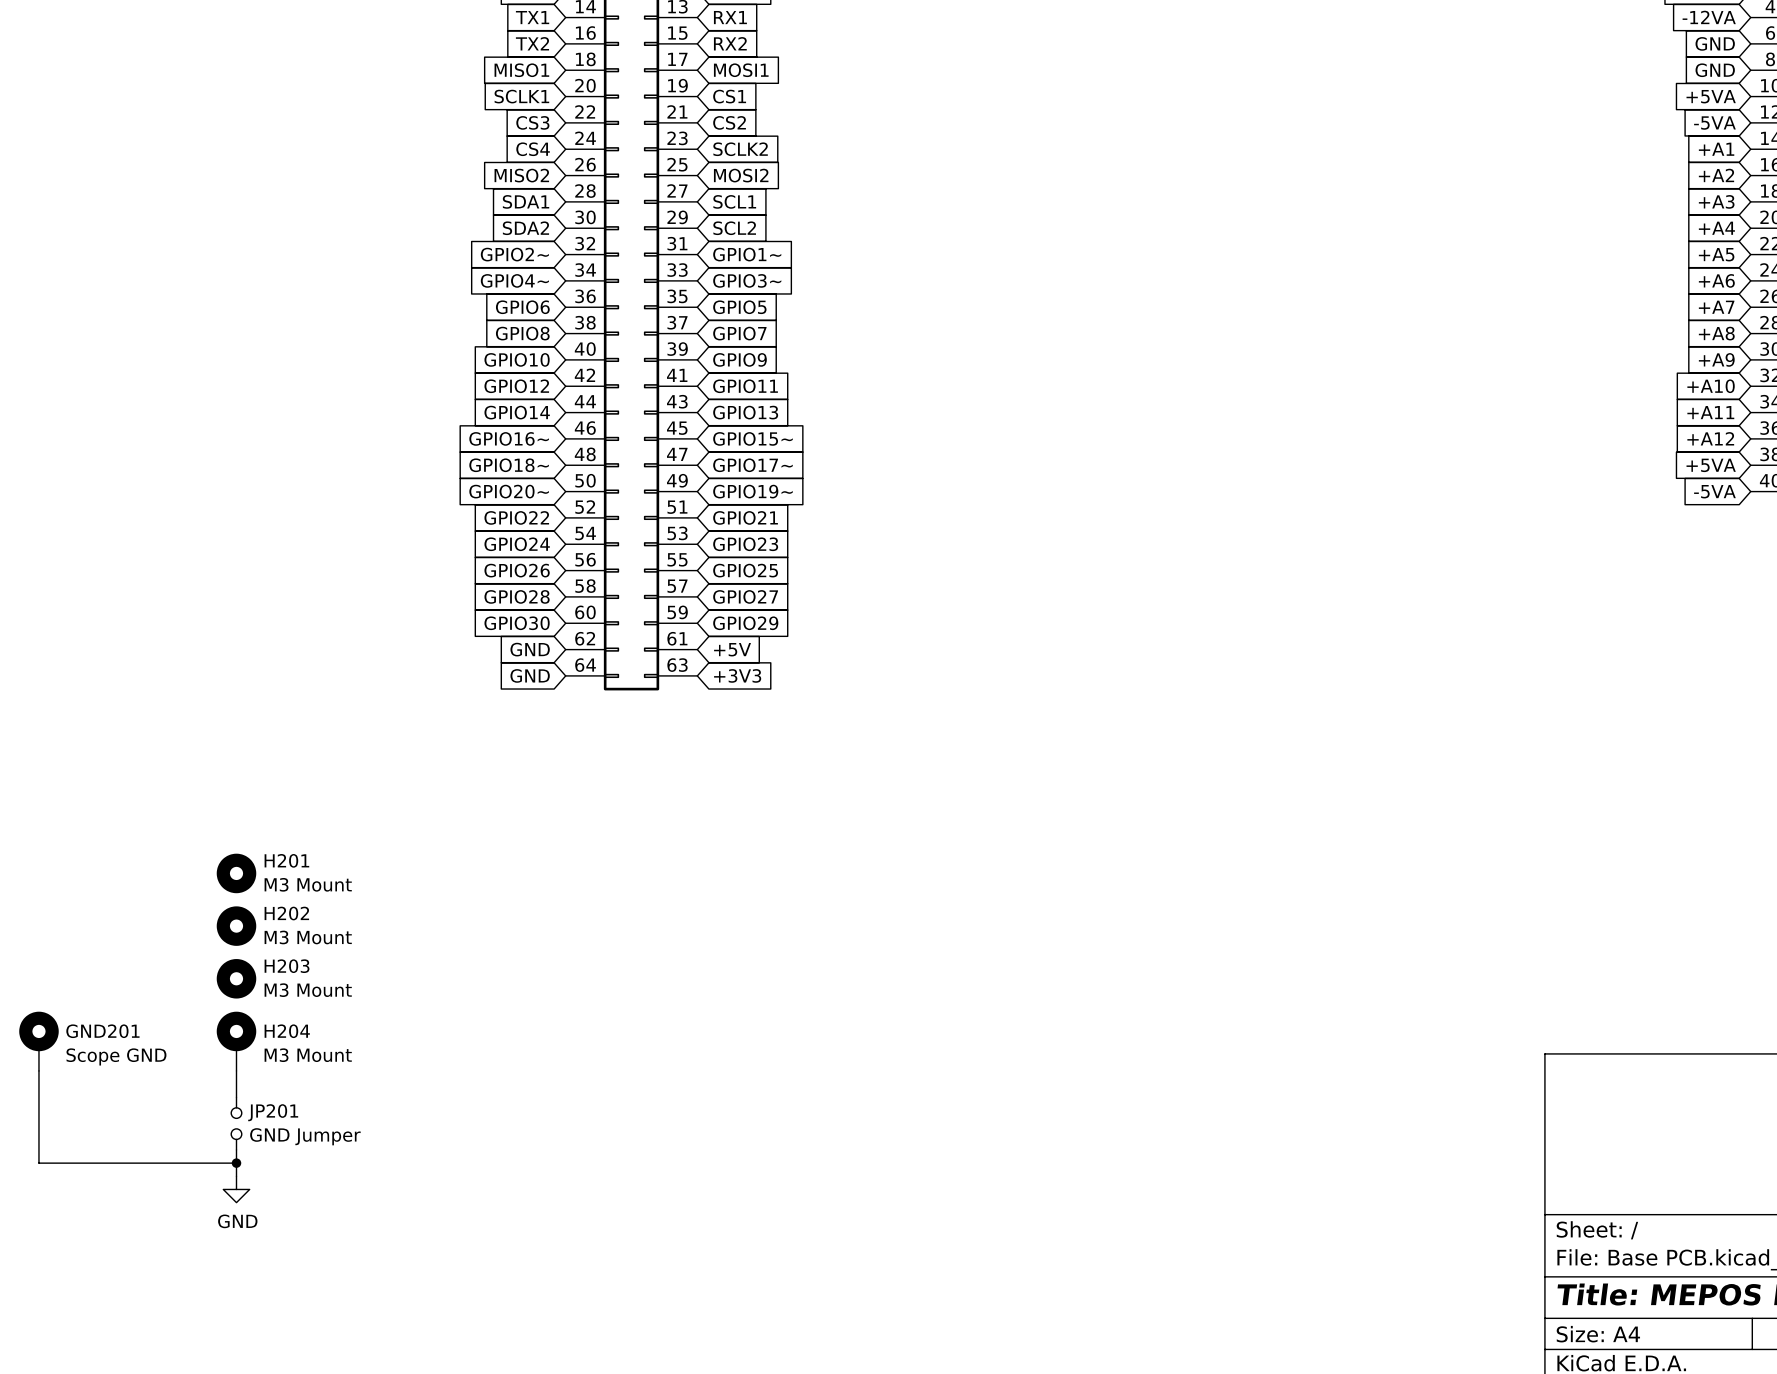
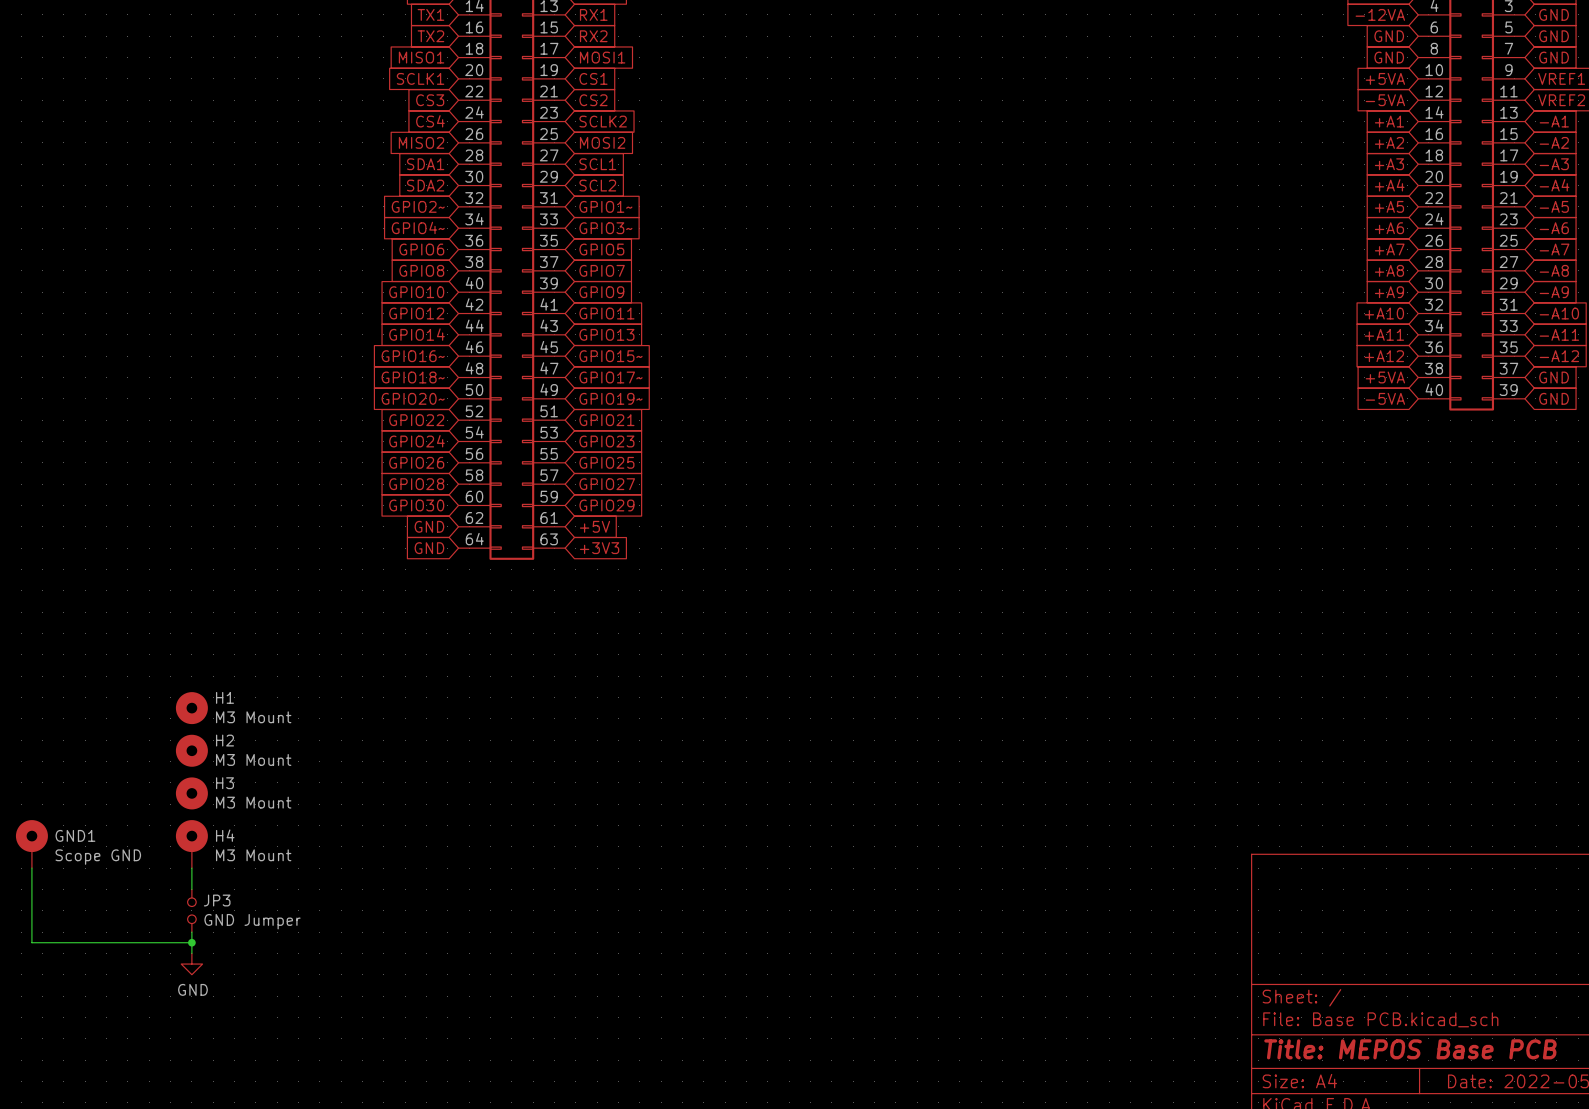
H201 name: H201 (286, 860) -> H1 (224, 697)
H202 name: H202 (286, 913) -> H2 (224, 740)
H203 name: H203 (287, 966) -> H3 (224, 783)
GND201 name: GND201 (102, 1031) -> GND1 (75, 835)
H204 name: H204 (287, 1031) -> H4 (225, 835)
JP201 name: JP201 (273, 1112) -> JP3 (217, 900)

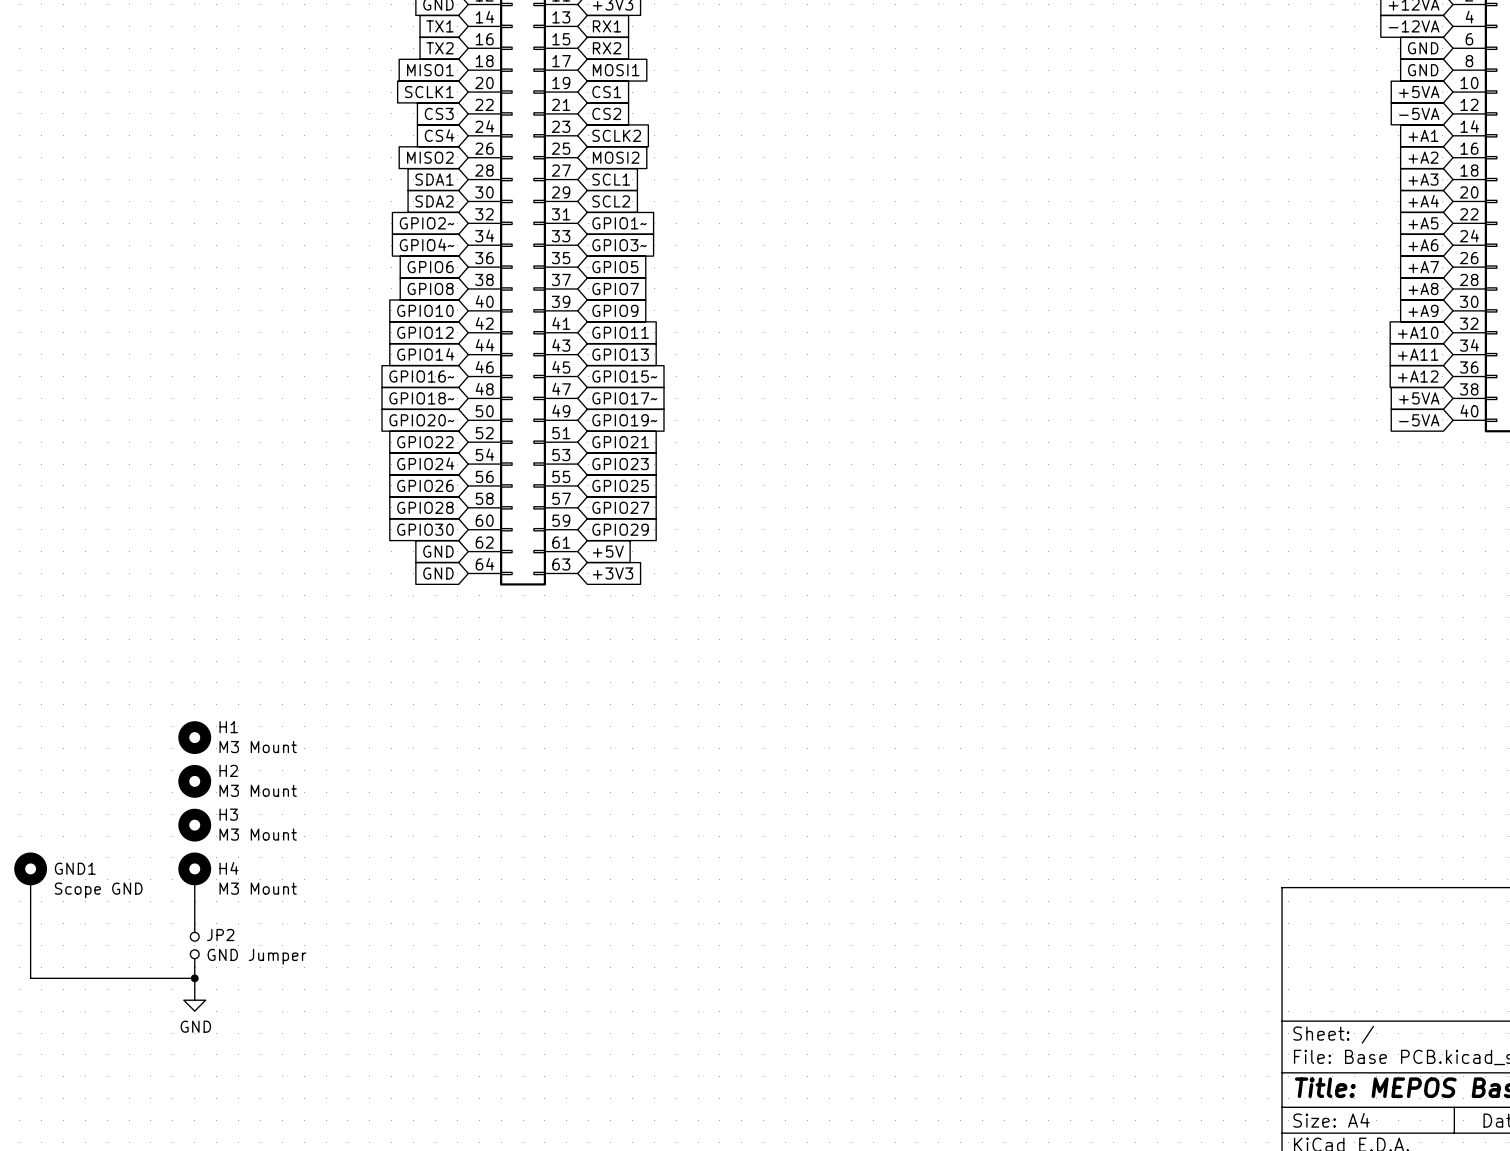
JP3 name: JP3 (217, 900) -> JP2 (220, 935)

